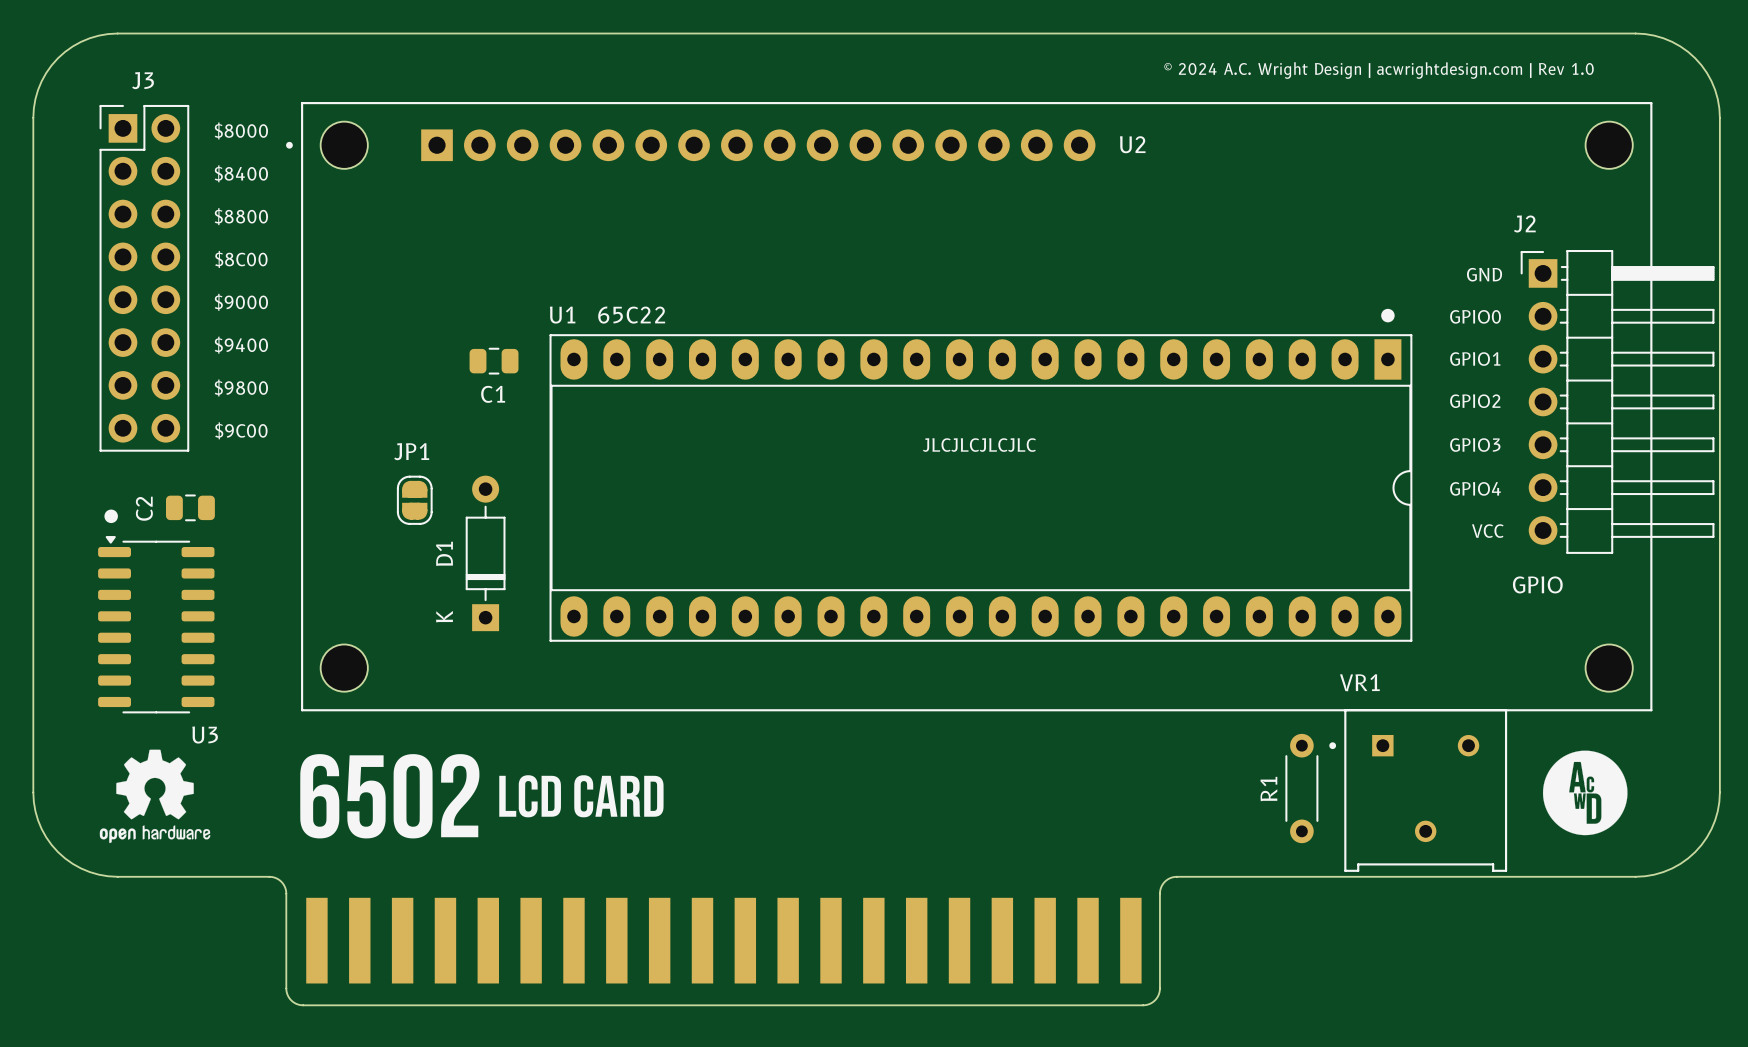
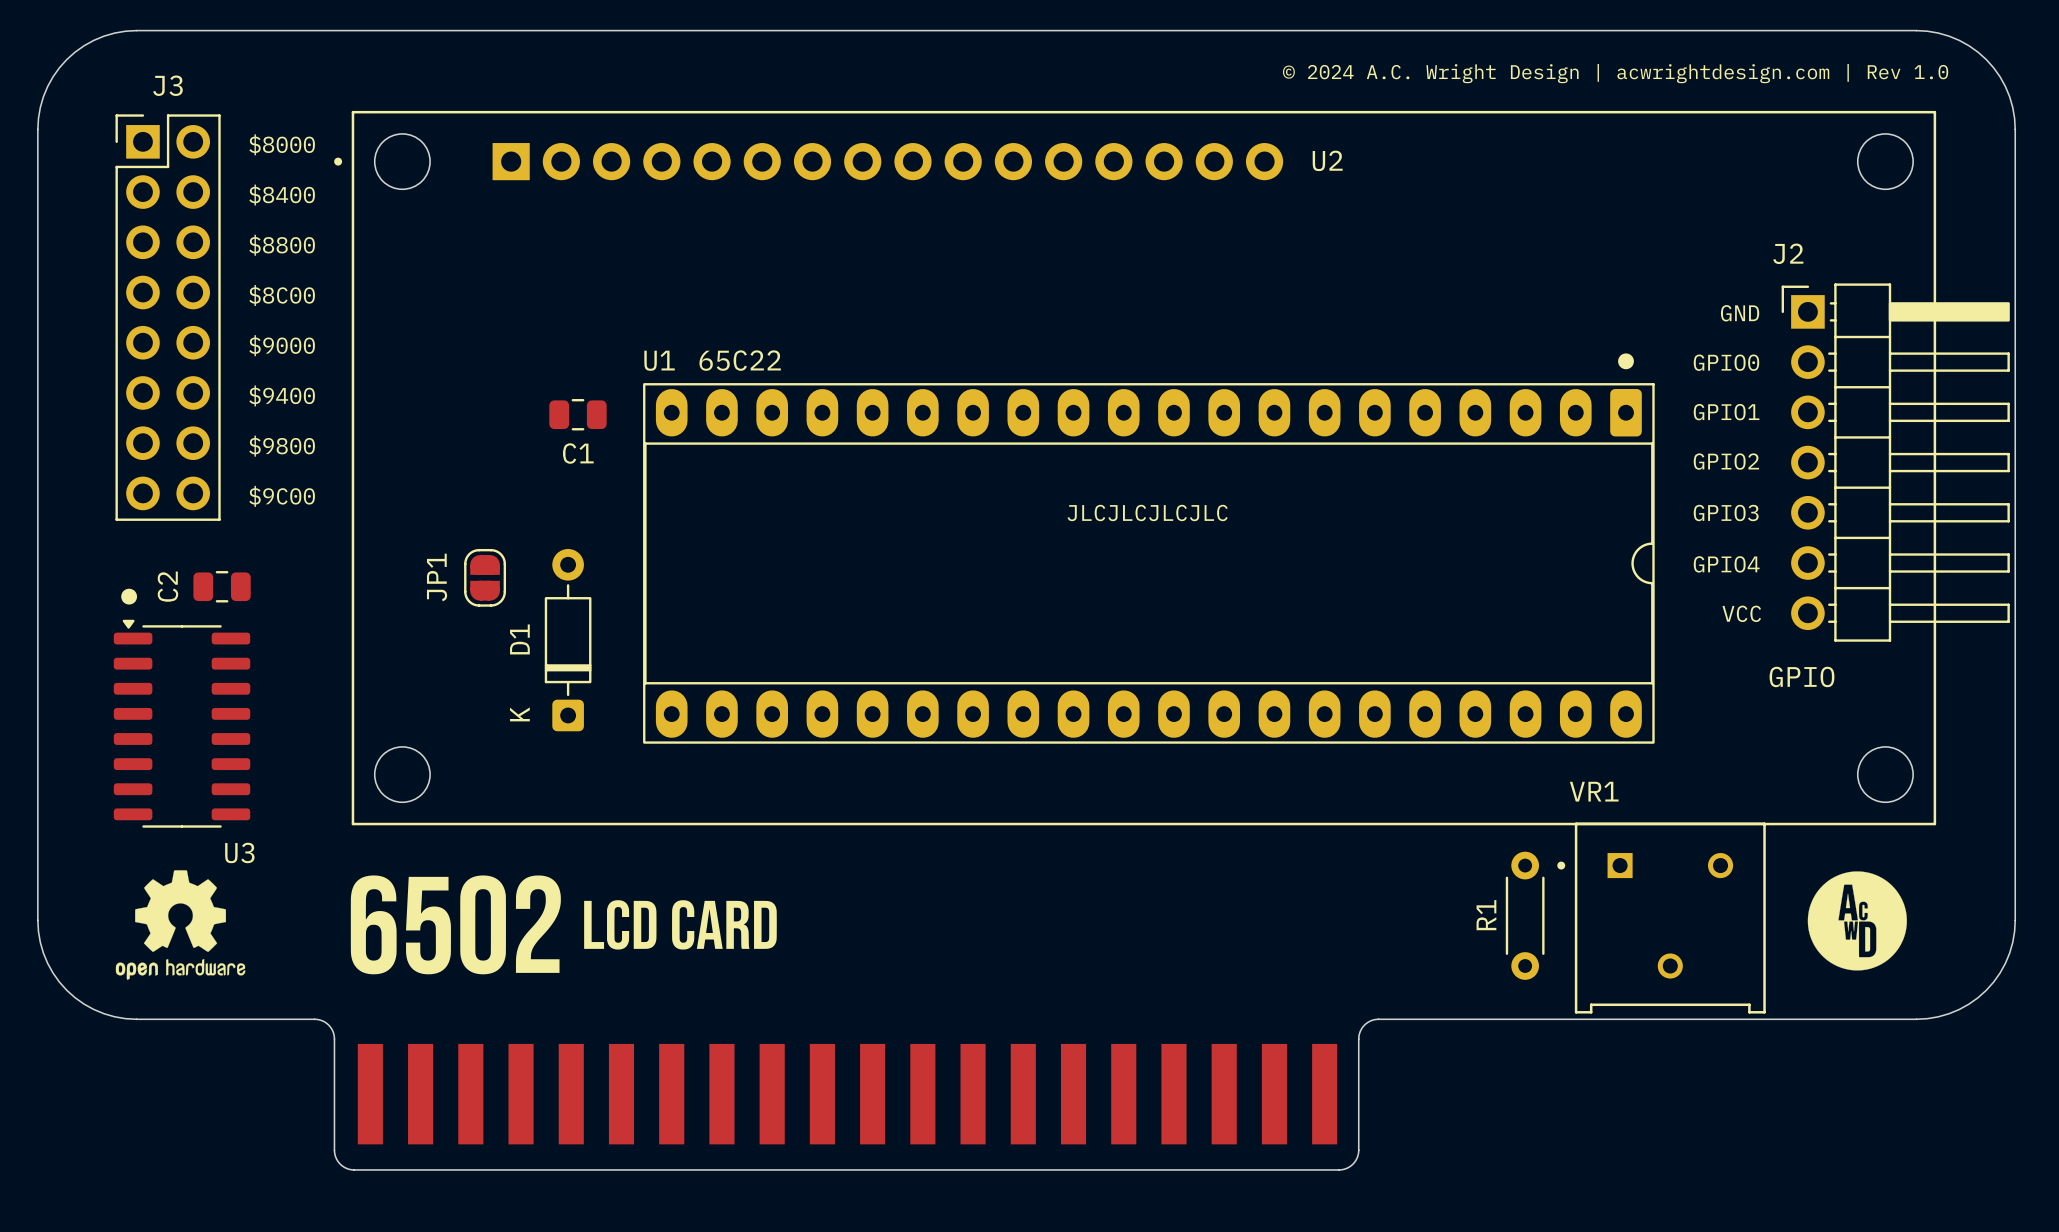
J2 footprint: [1520, 249, 1715, 554] -> [1781, 283, 2010, 642]
U1 footprint: [549, 334, 1413, 642] -> [643, 383, 1655, 744]
JP1 name rotation: 0° (411, 451) -> 90° counterclockwise (437, 577)
JP1 name position: JP1 (411, 451) -> JP1 (437, 577)
D1 footprint: [465, 475, 506, 632] -> [544, 548, 592, 732]

